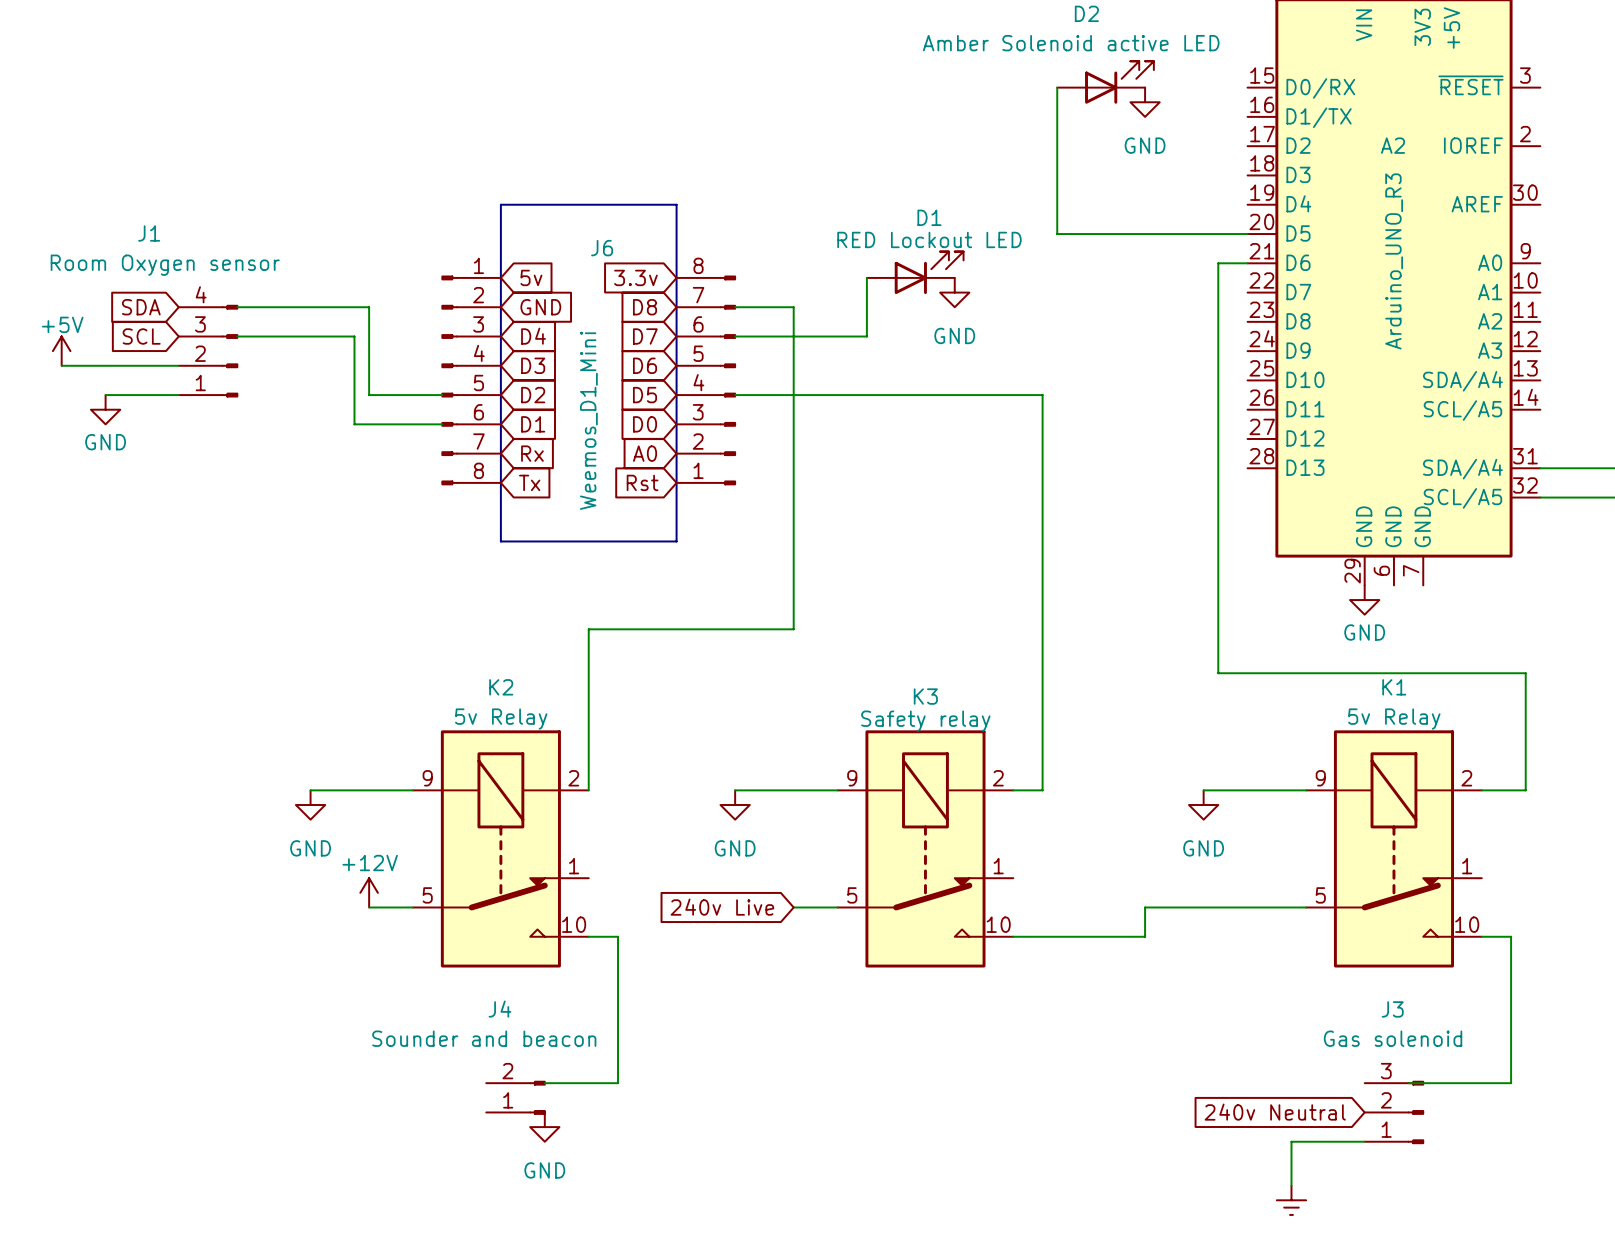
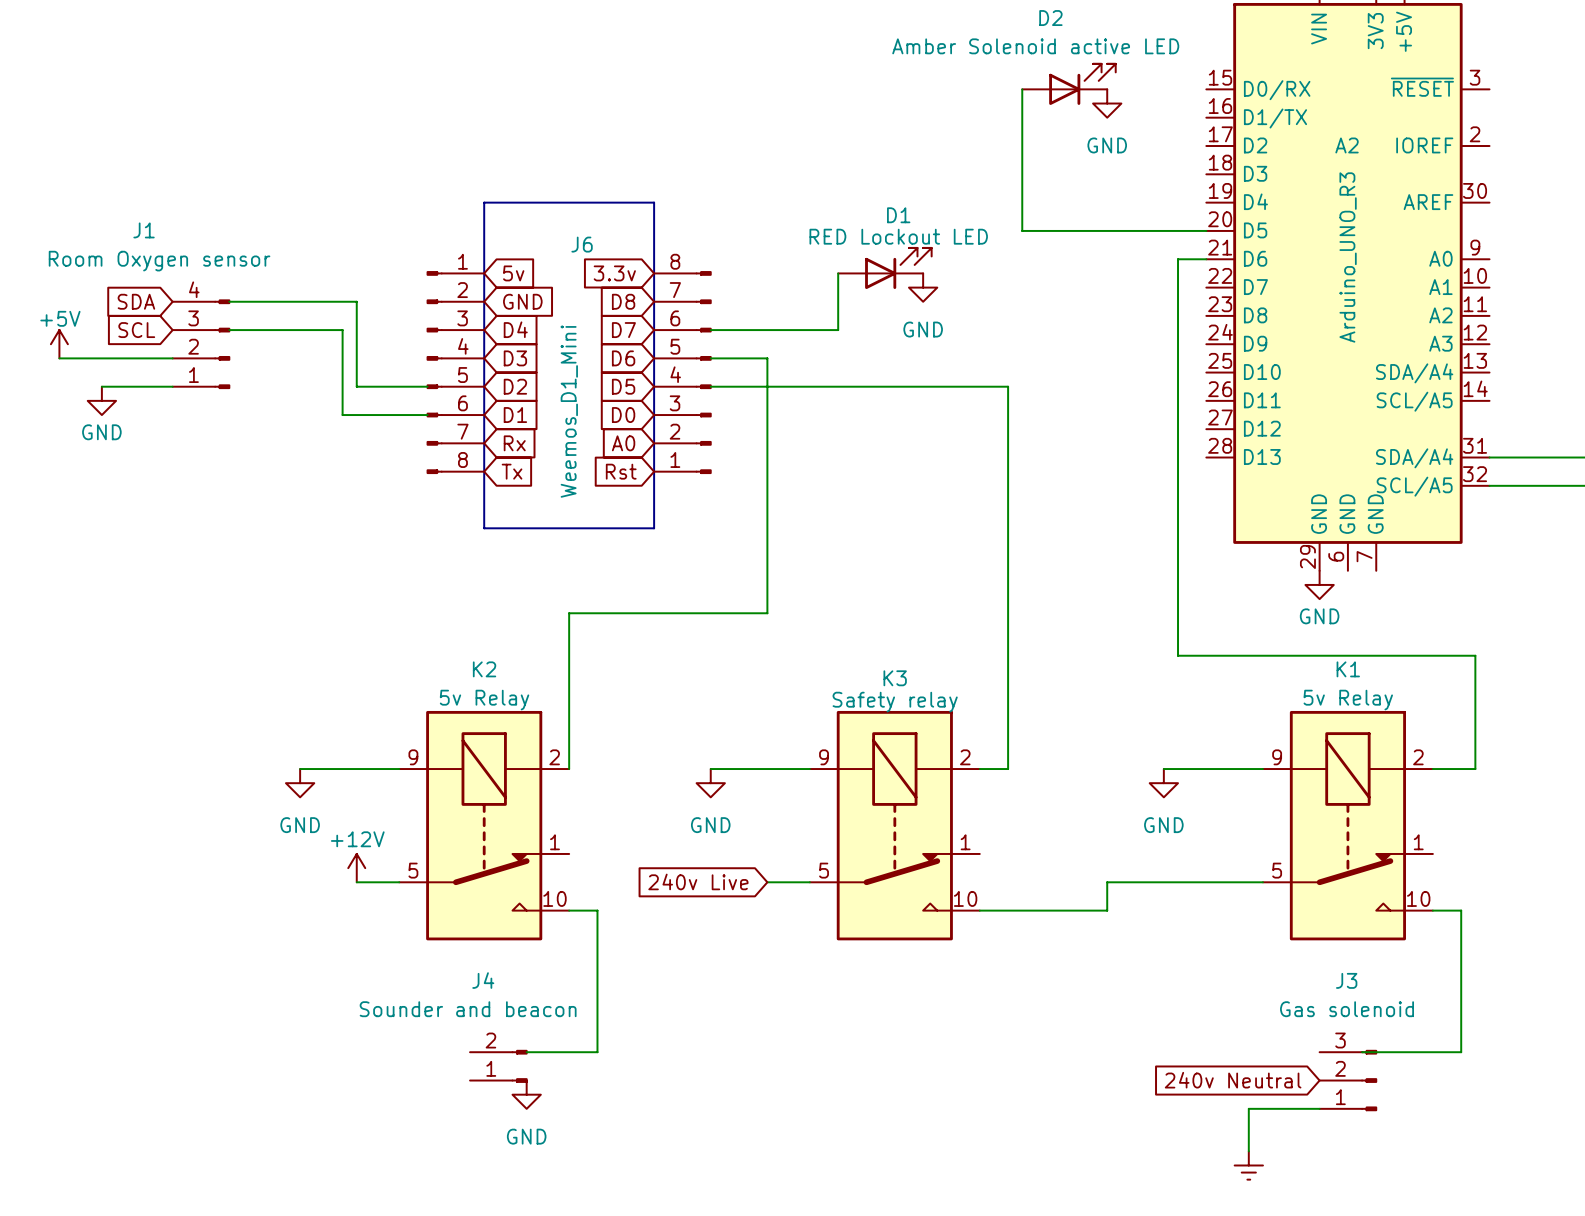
wire: (735, 307) (793, 307) (793, 365) -> (710, 358) (767, 358)

